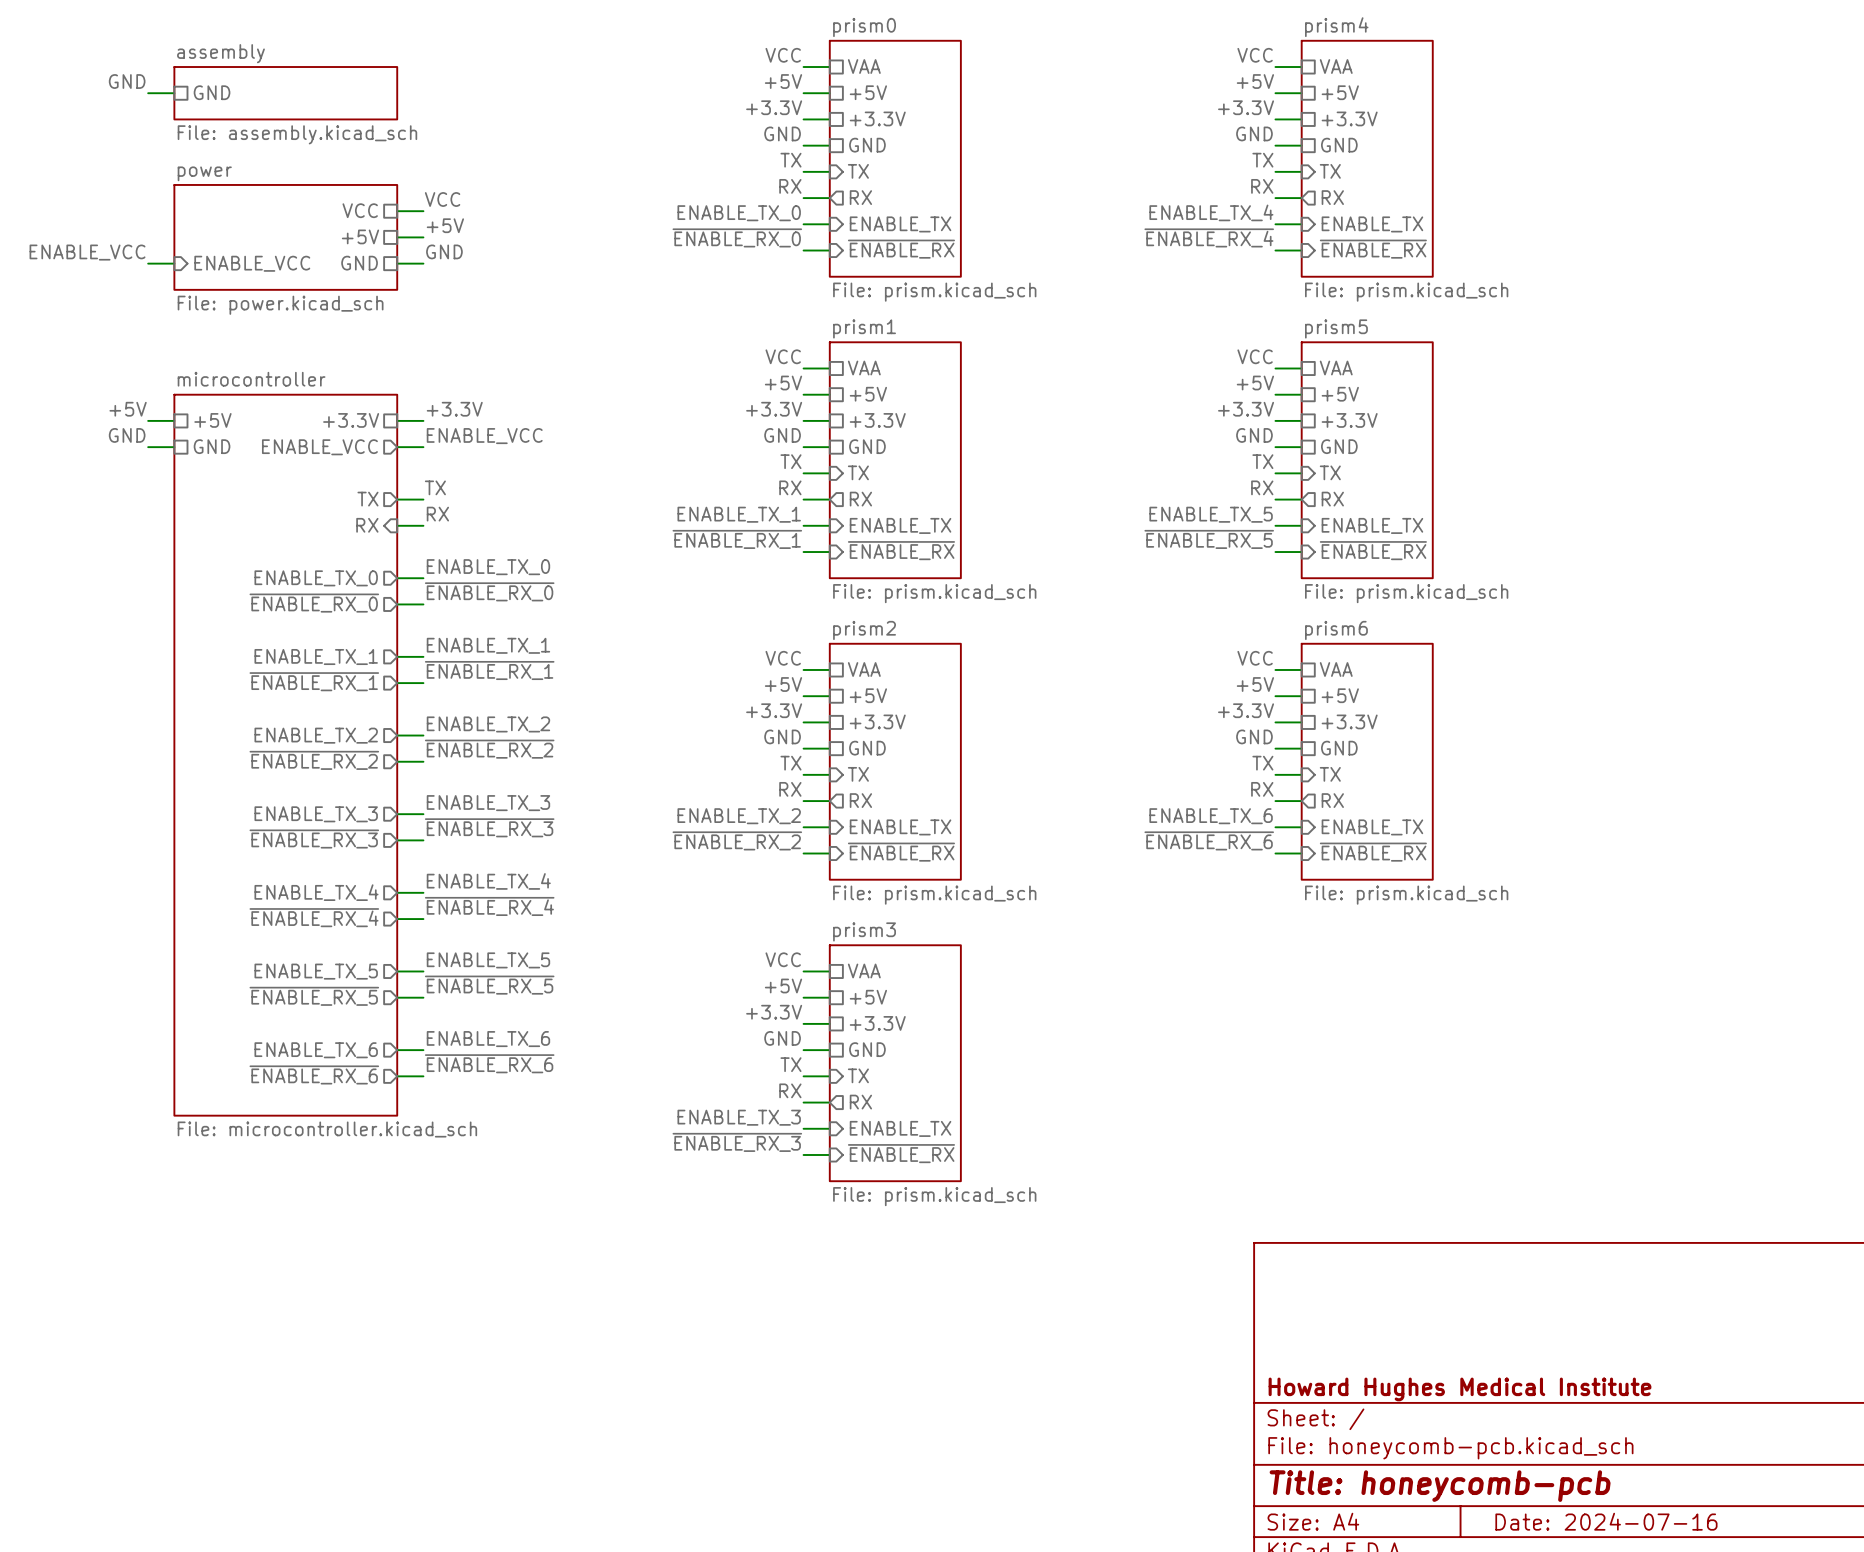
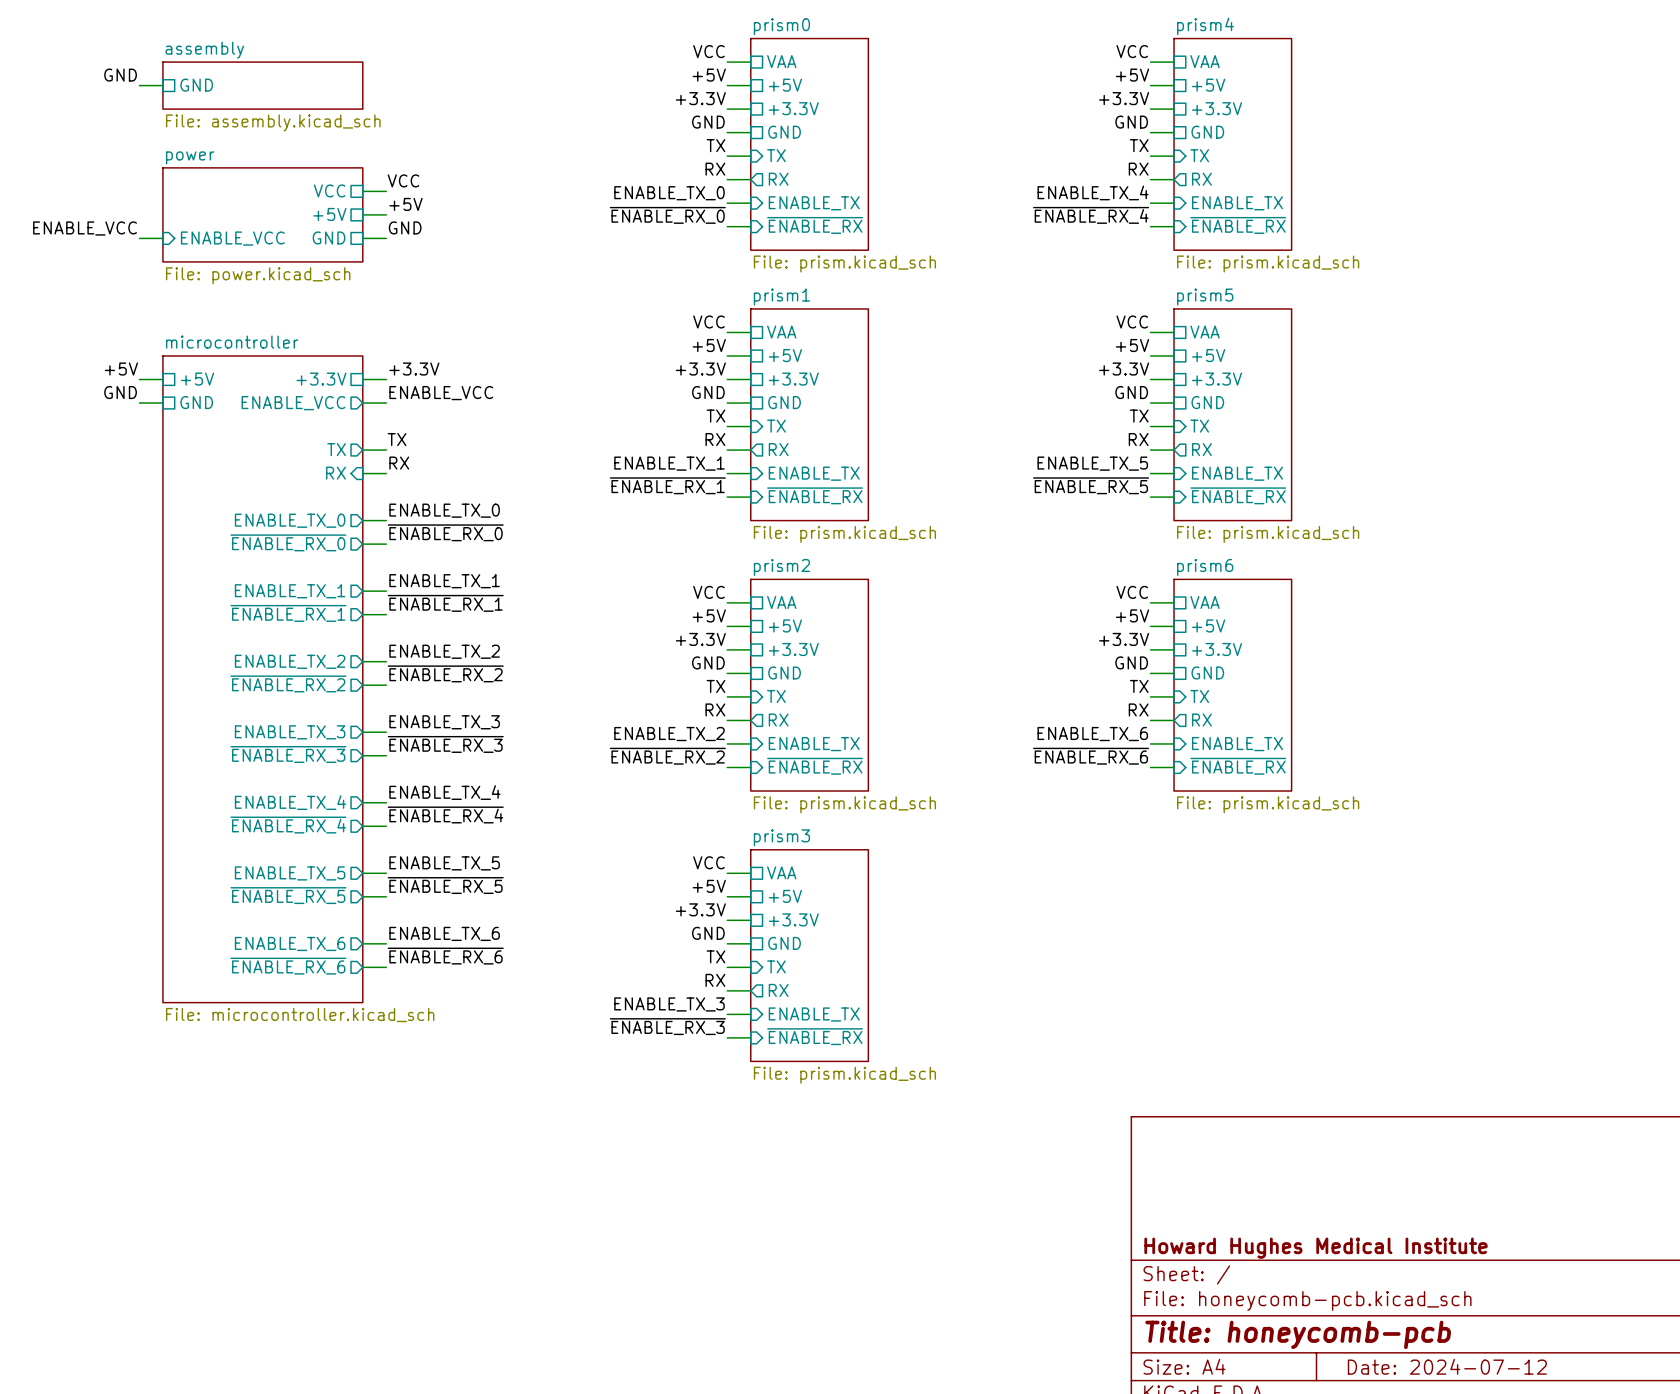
title block: Date: 2024-07-16 (1606, 1521) -> Date: 2024-07-12 (1447, 1366)

